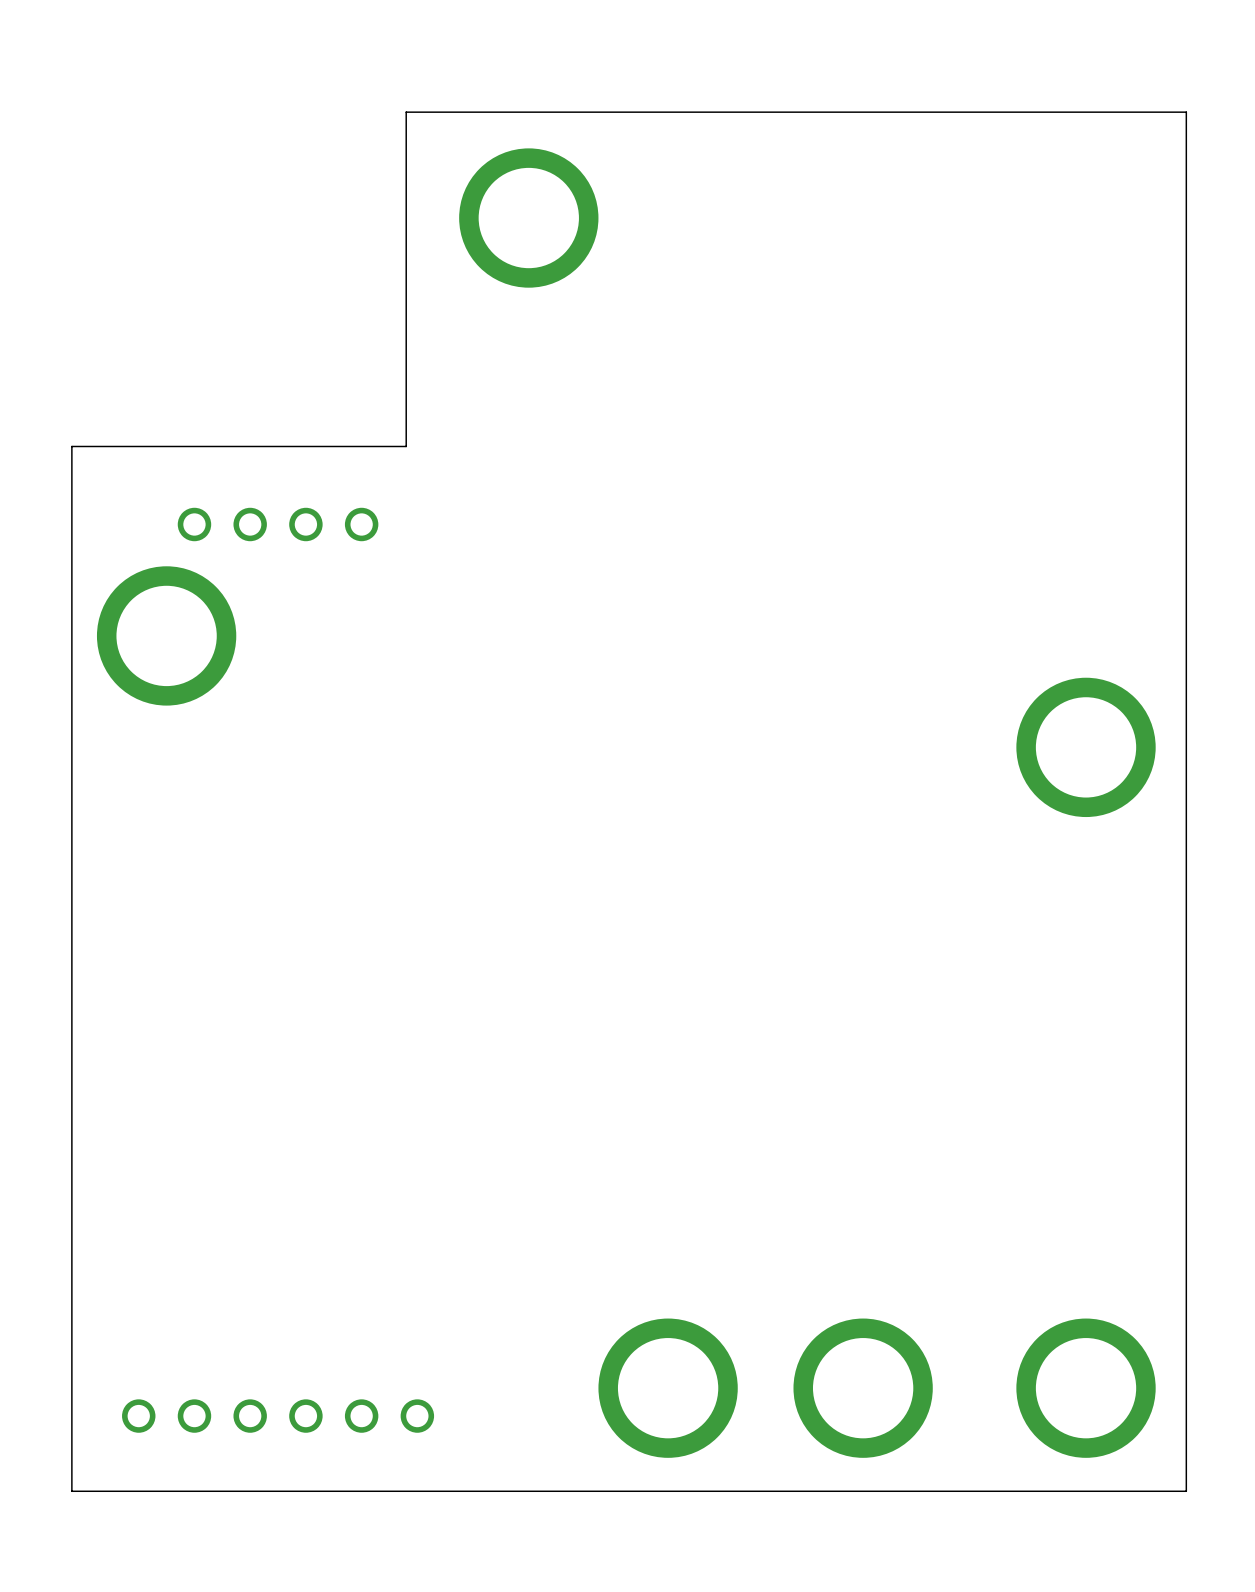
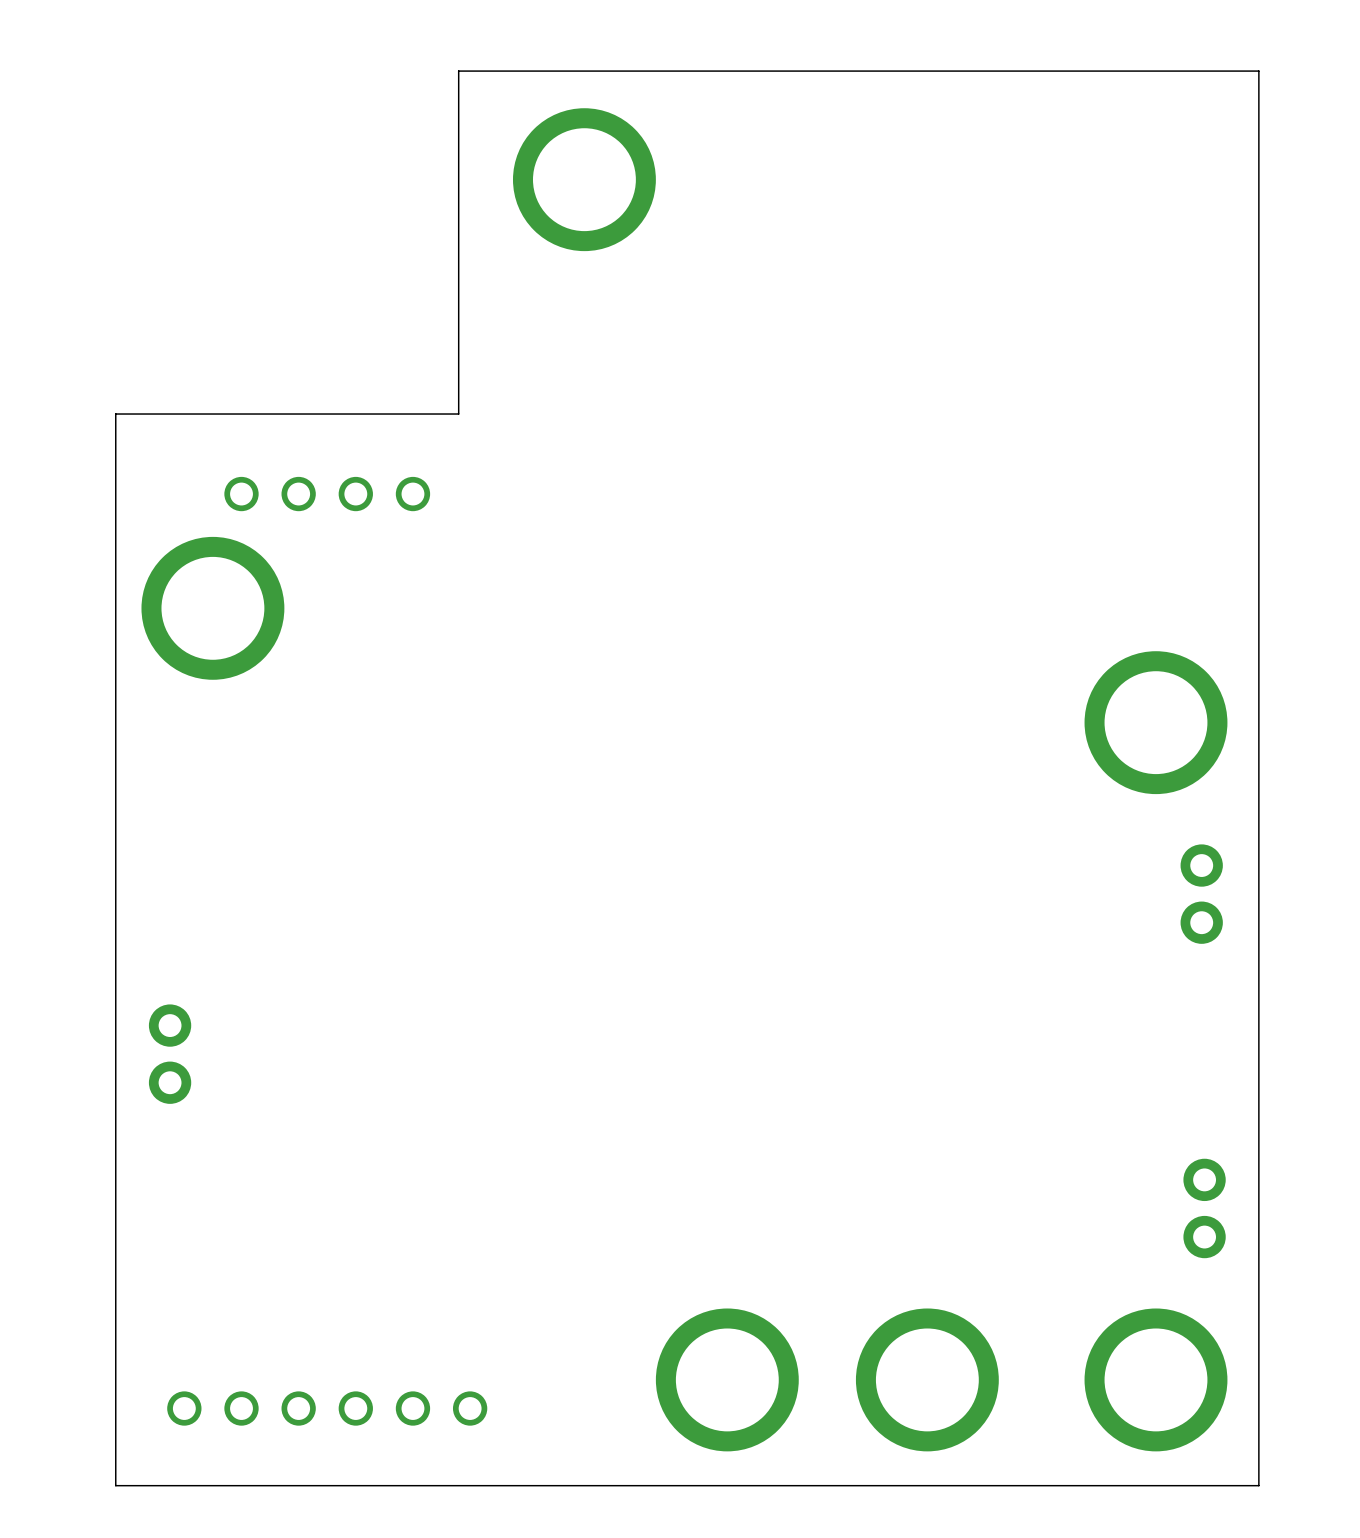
part: none -> (1201, 894)
part: none -> (170, 1054)
part: none -> (1204, 1208)

